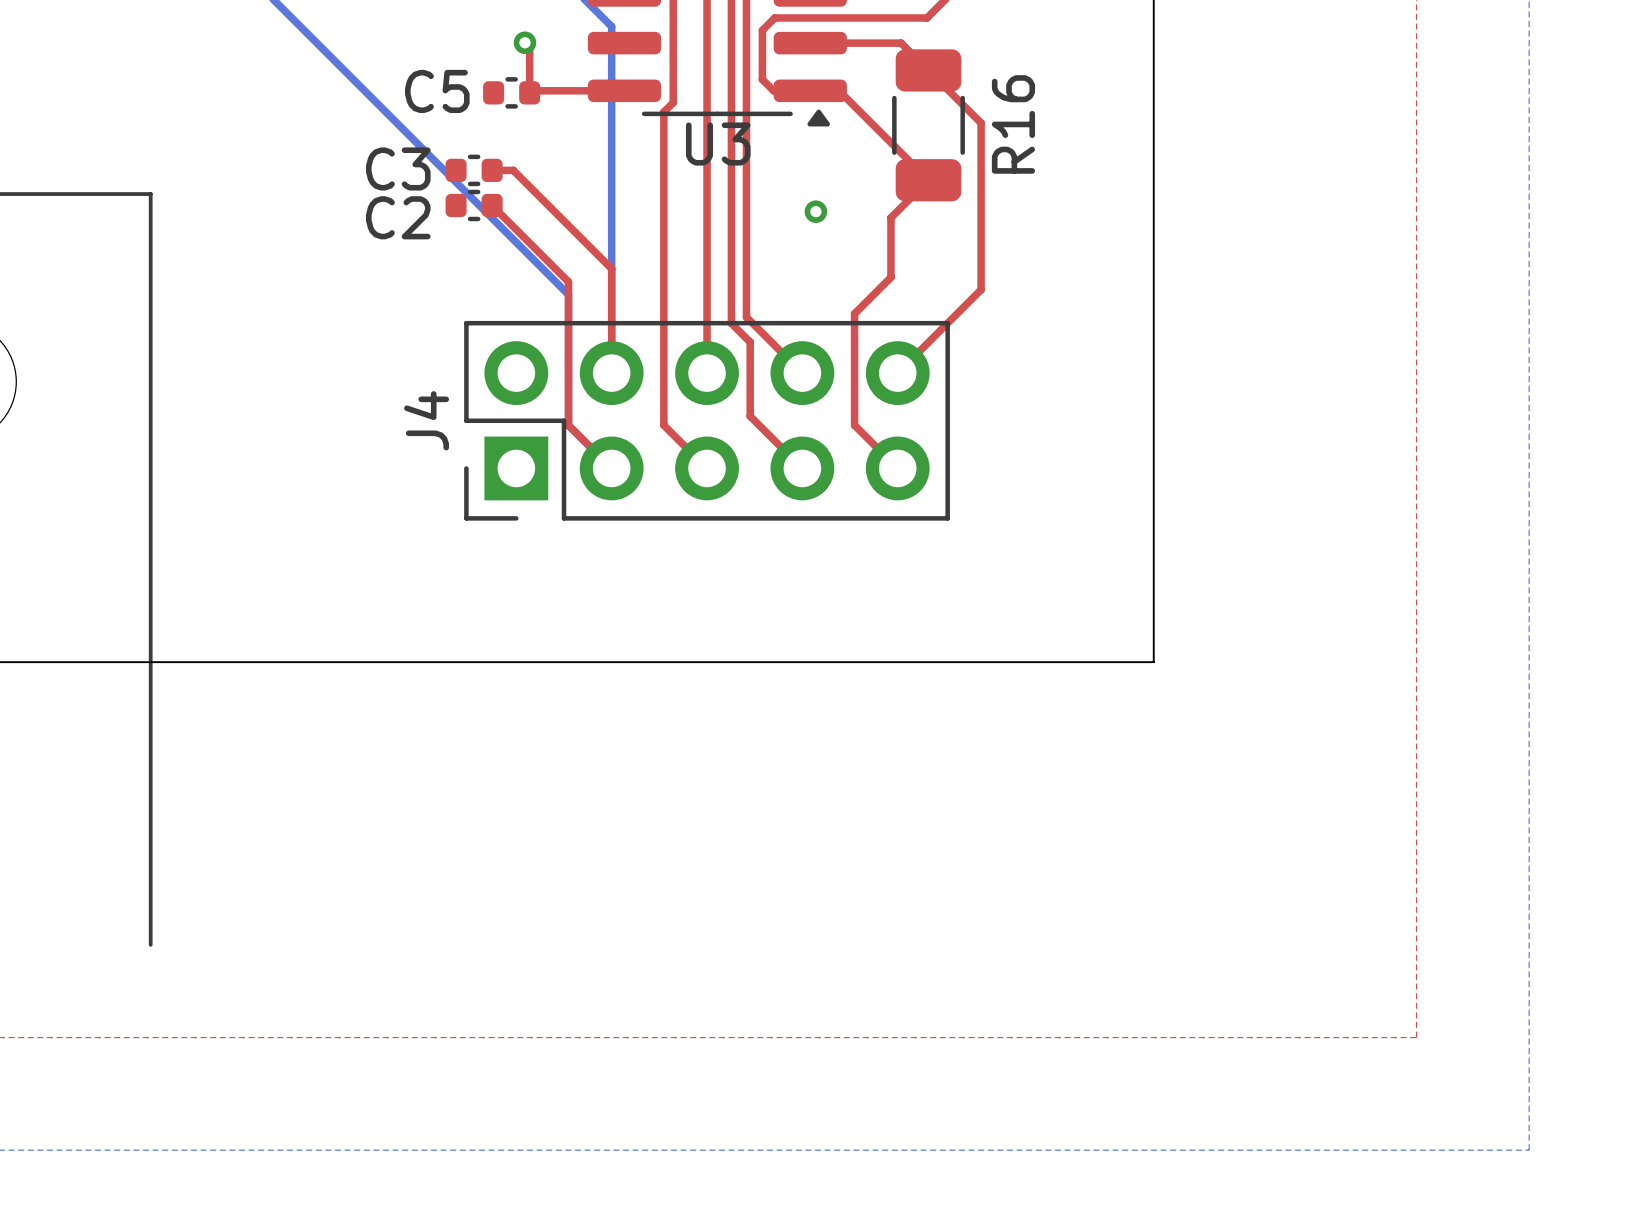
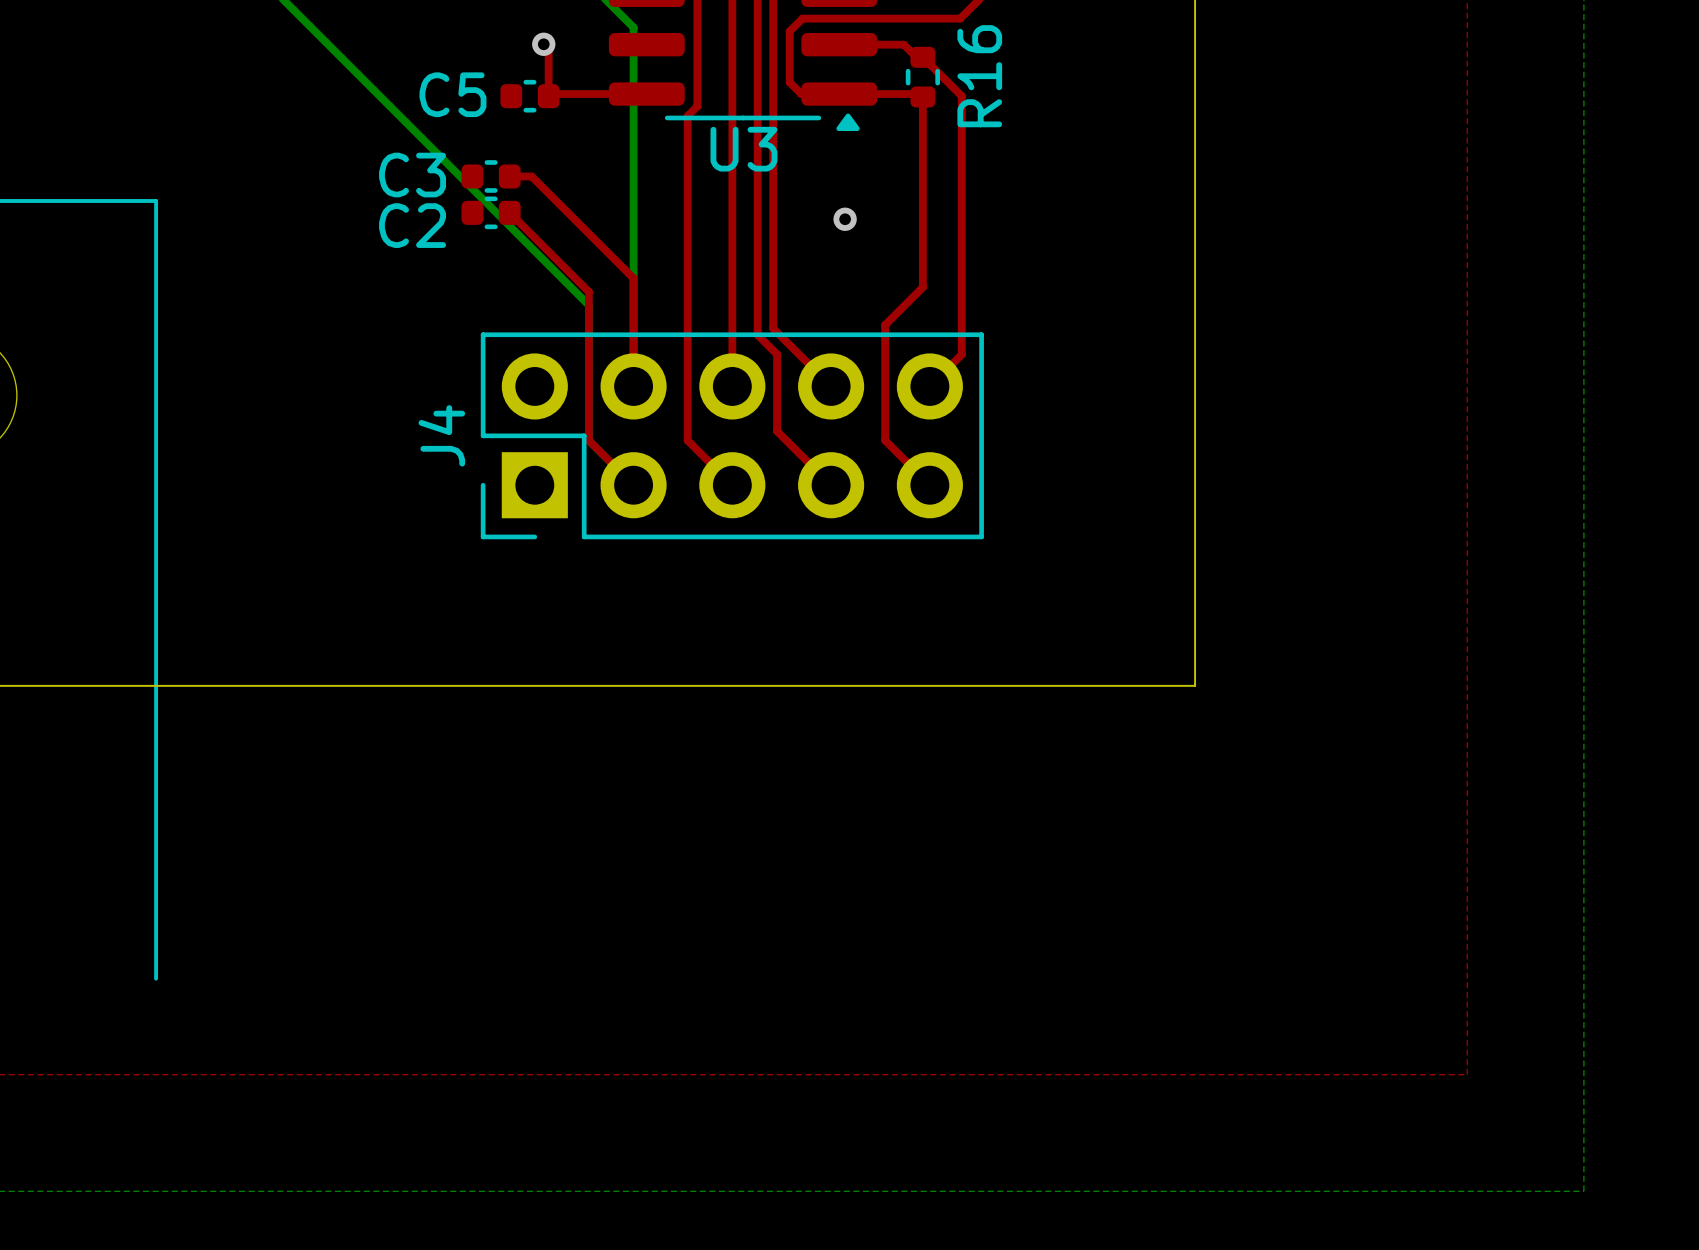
top track: (872, 43) (901, 43) (981, 122) (981, 289) (928, 342) -> (903, 44) (916, 57) (922, 57) (961, 96) (961, 354)
R16 footprint: [892, 49, 965, 202] -> [905, 46, 940, 108]
top track: (839, 90) (928, 180) (890, 217) -> (869, 94) (919, 94) (922, 96) (922, 225)

